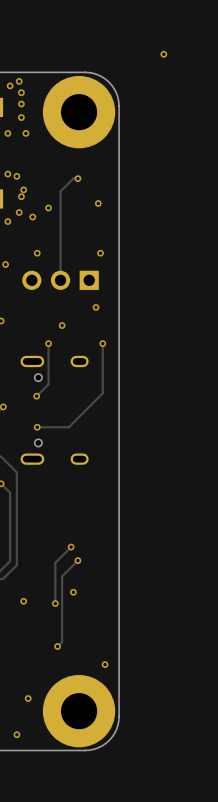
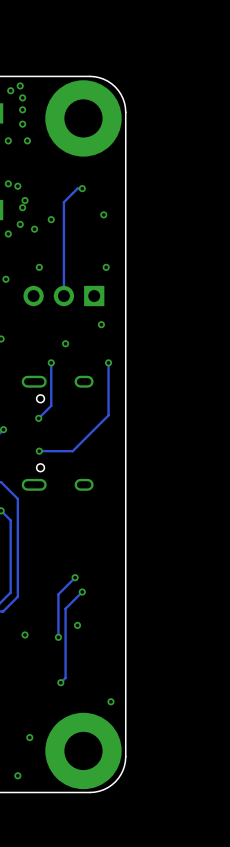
via: (163, 54) -> none

